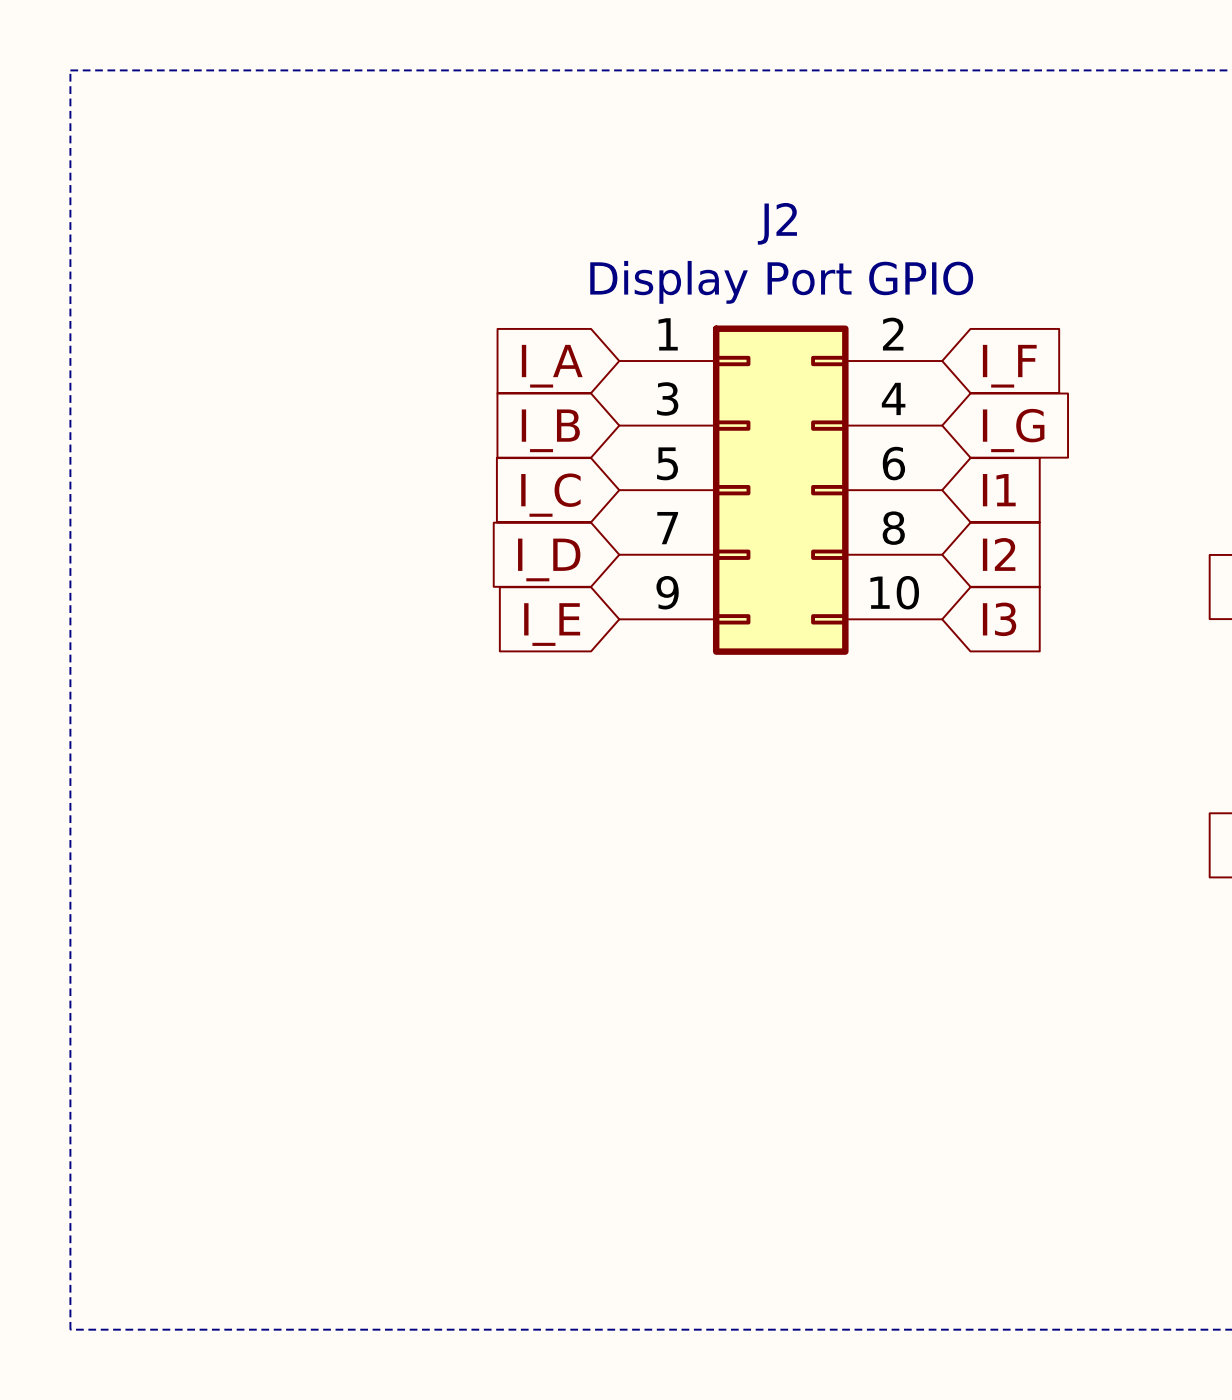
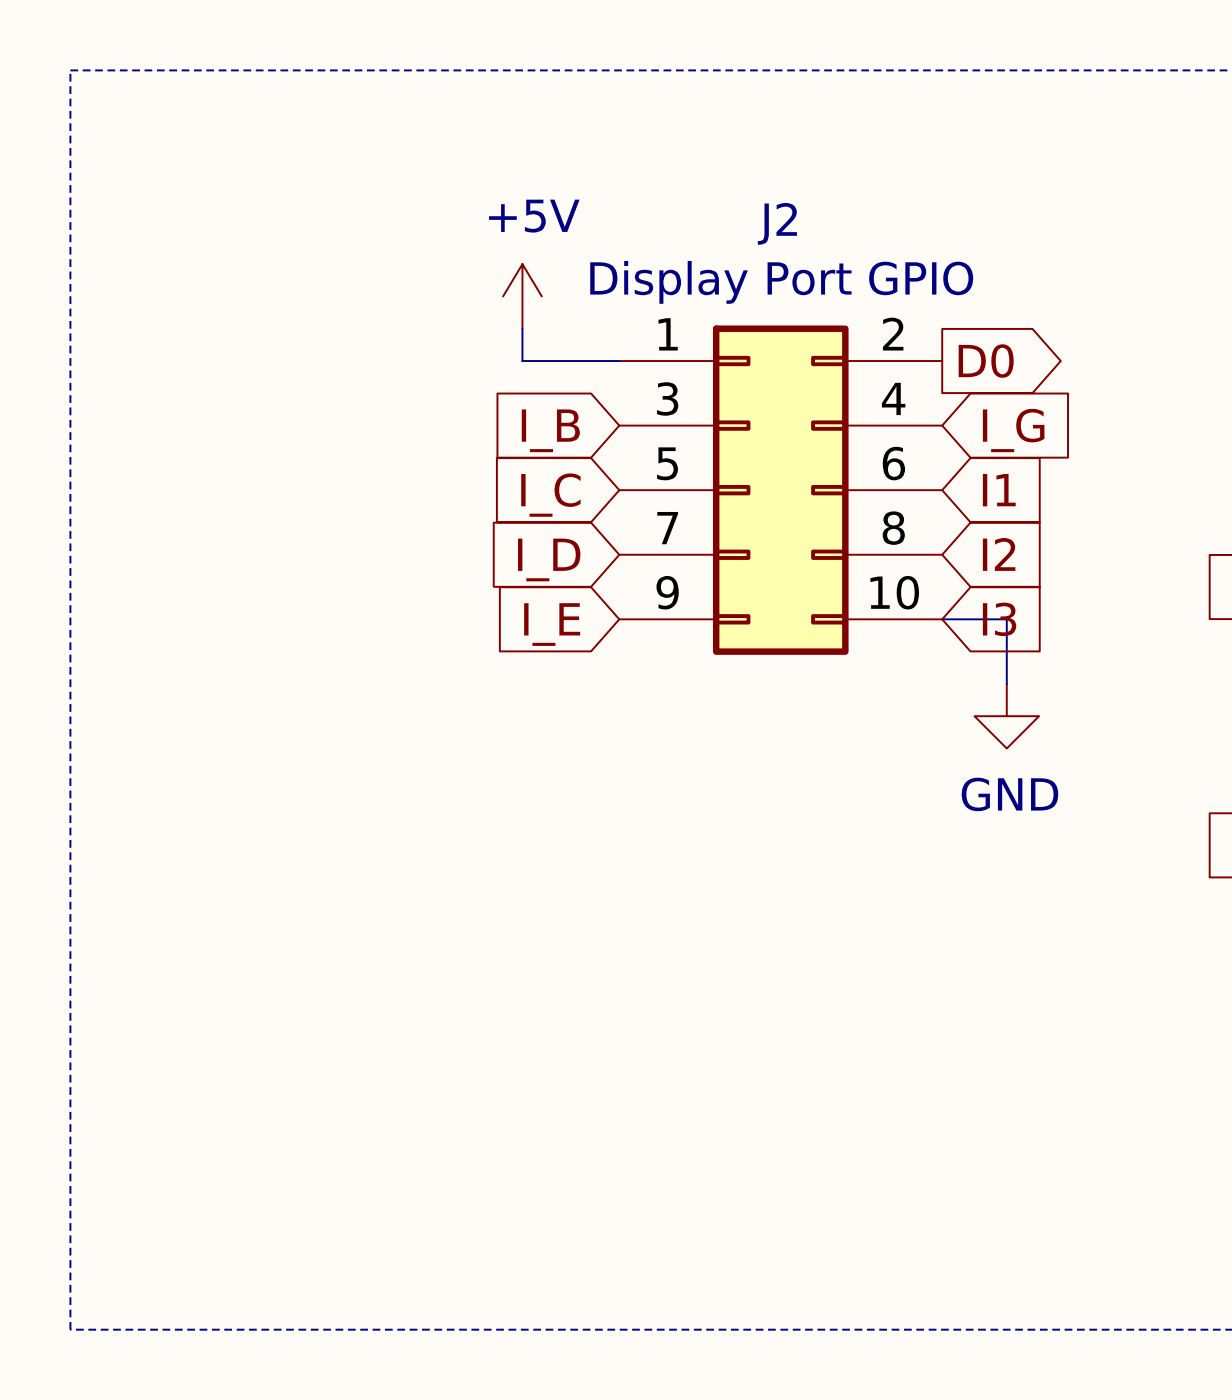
power symbol: none -> +5V (522, 296)
wire: none -> (522, 328) (522, 361) (619, 361)
global label: I_A (552, 366) -> none
global label shape: input (1009, 366) -> output (986, 361)
global label: I_F (1009, 366) -> D0 (986, 361)
wire: none -> (942, 619) (1006, 619) (1006, 683)
power symbol: none -> GND (1006, 716)

